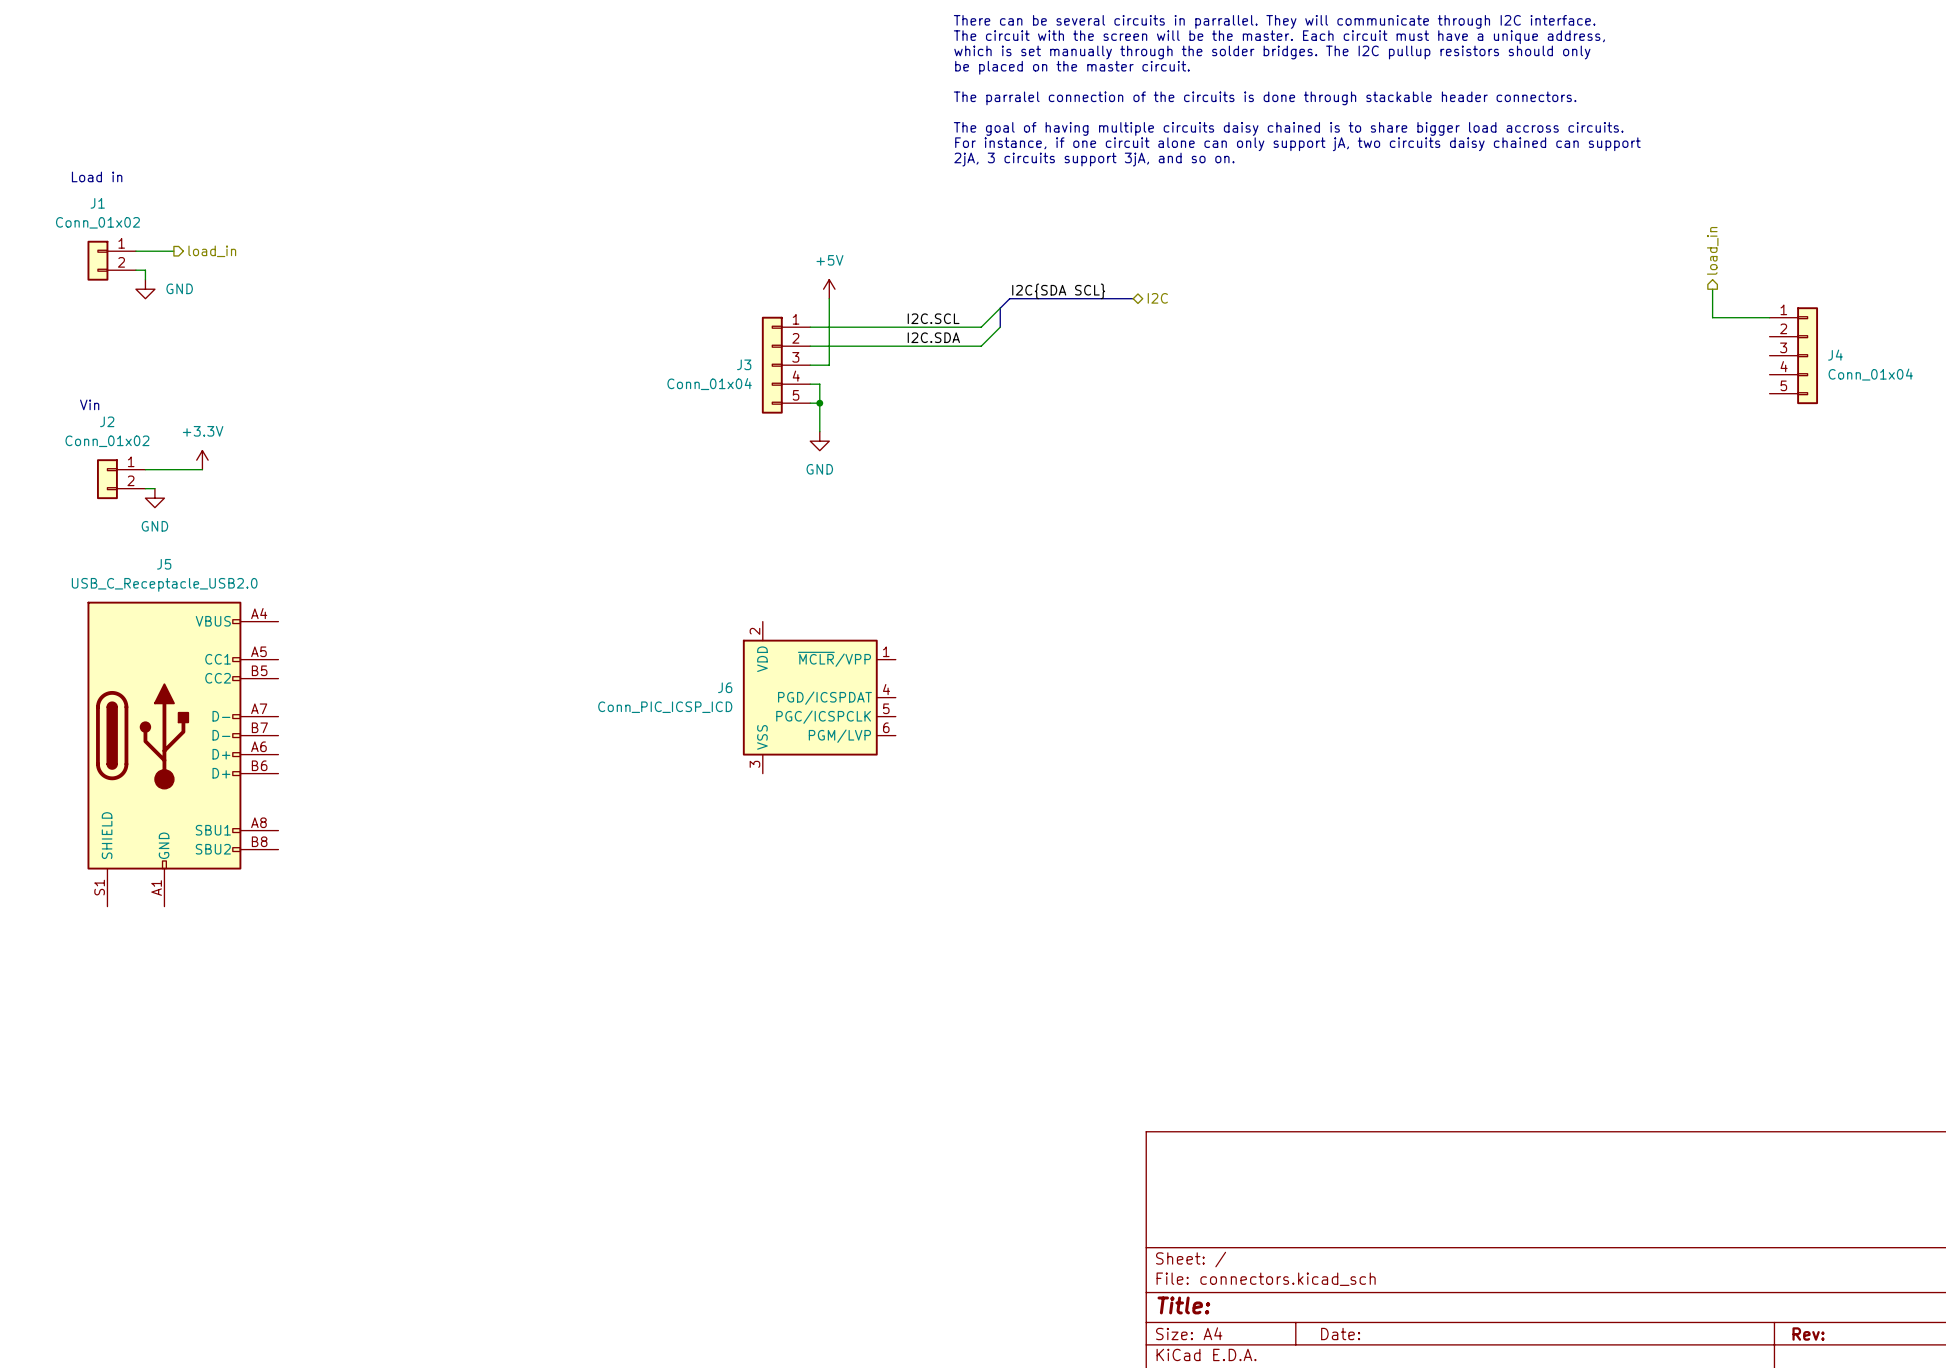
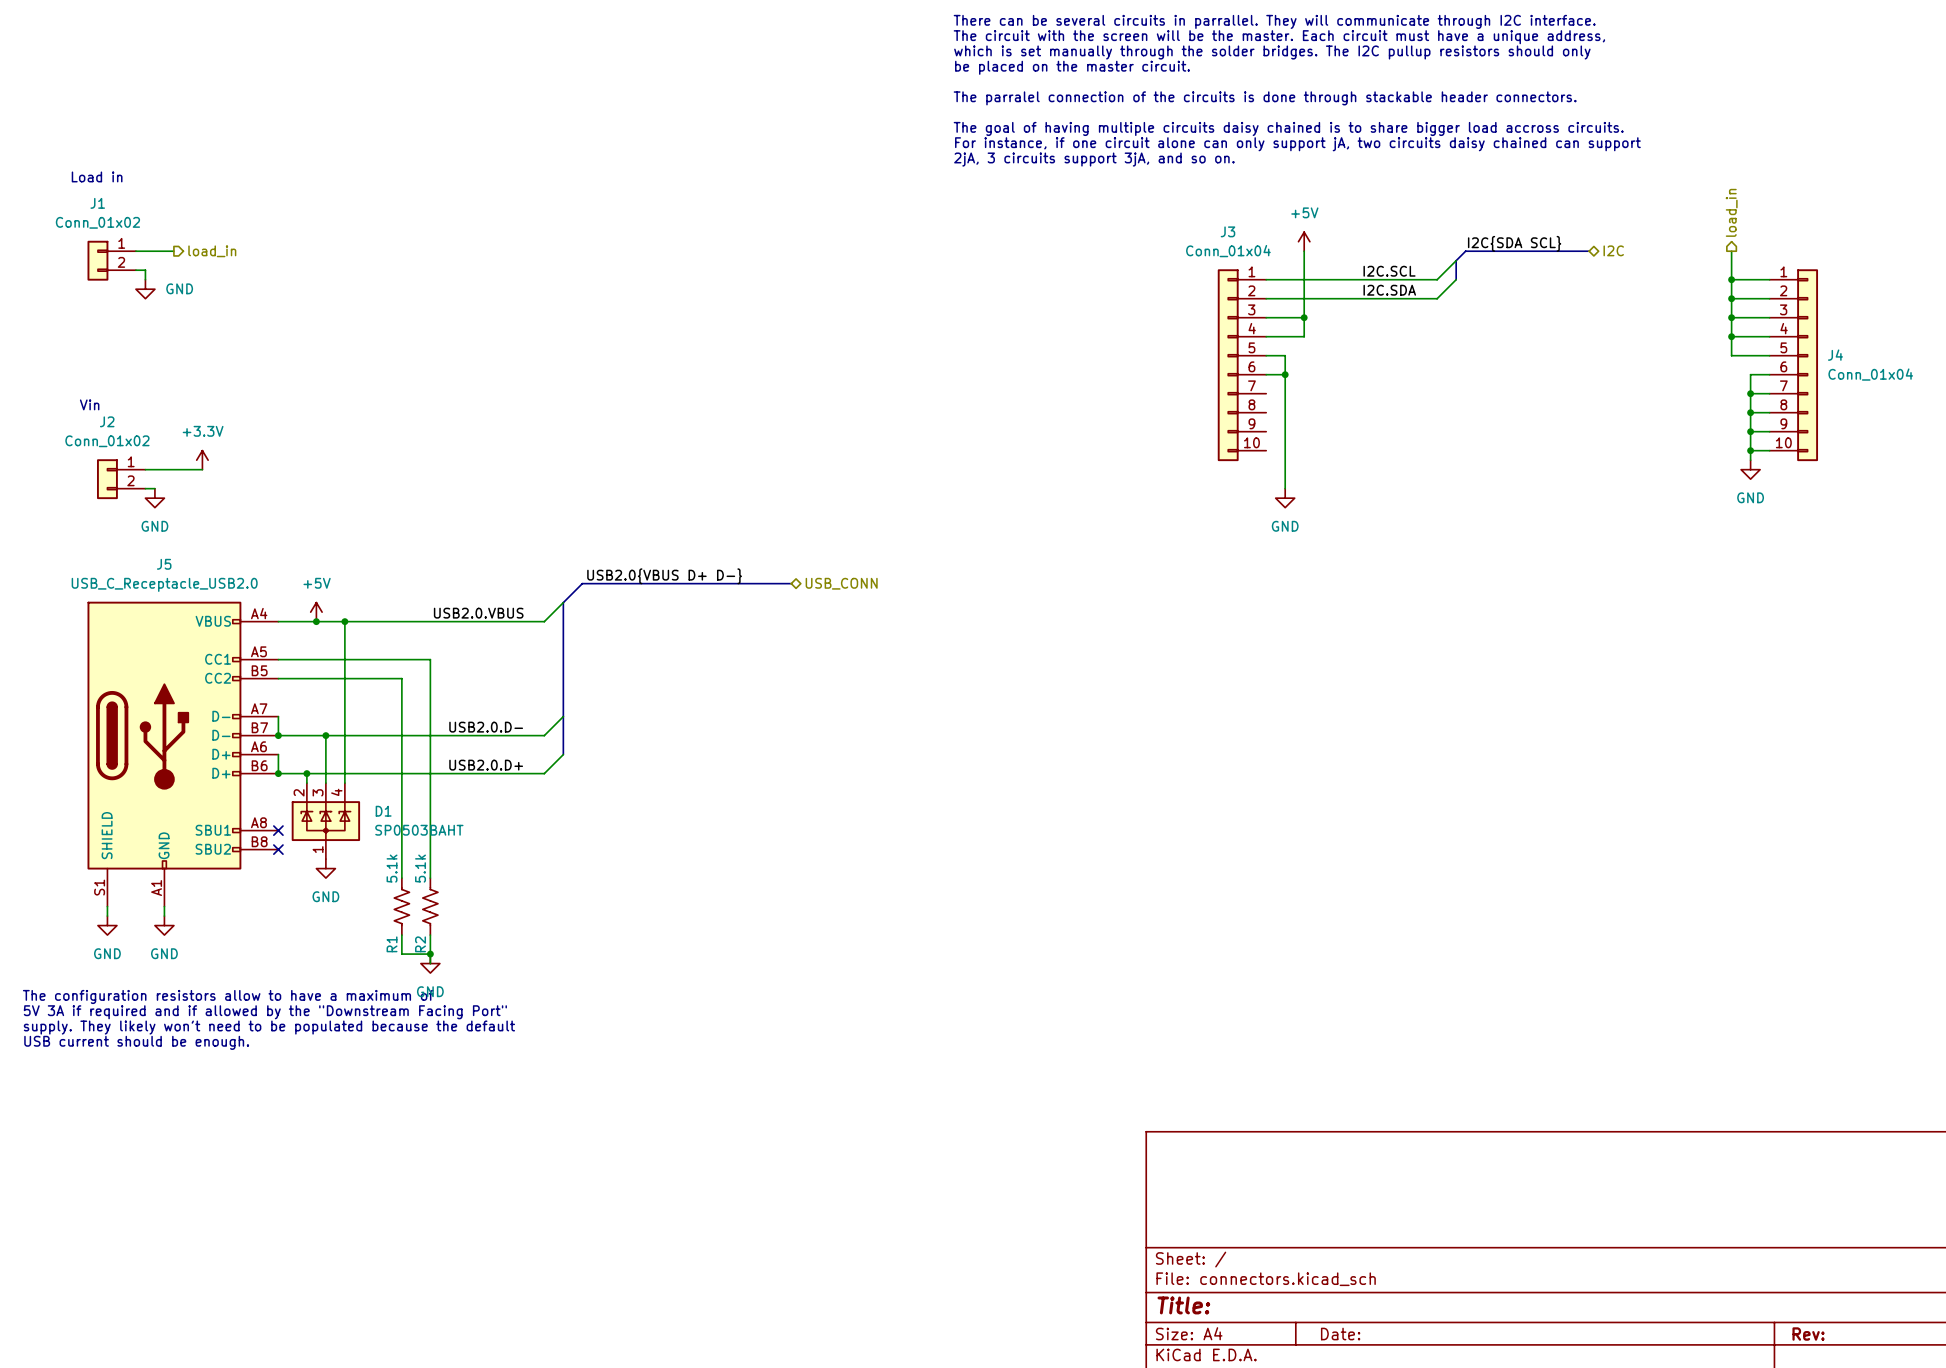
power symbol: none -> +5V (1304, 241)
label: none -> I2C{SDA SCL} (1514, 243)
hierarchical label: none -> I2C (1613, 250)
hierarchical label position: load_in (1712, 250) -> load_in (1731, 212)
wire: none -> (1304, 251) (1304, 336) (1266, 336)
bus: none -> (1589, 251) (1465, 251) (1456, 260) (1456, 279)
wire: none -> (1731, 251) (1731, 355) (1769, 355)
wire: none -> (1456, 260) (1437, 279) (1266, 279)
label: none -> I2C.SCL (1389, 271)
wire: none -> (1456, 279) (1437, 298) (1266, 298)
wire: none -> (1731, 279) (1769, 279)
junction: none -> (1731, 279)
power symbol: +5V (829, 289) -> none
wire: (1712, 289) (1712, 317) (1731, 317) -> none
label: none -> I2C.SDA (1389, 290)
label: I2C{SDA SCL} (1058, 291) -> none
wire: (829, 298) (829, 365) (810, 365) -> none
bus: (1133, 298) (1009, 298) (1000, 308) (1000, 327) -> none
hierarchical label: I2C (1157, 298) -> none
wire: none -> (1731, 298) (1769, 298)
junction: none -> (1731, 298)
J4 symbol: [1769, 307, 1819, 405] -> [1769, 269, 1819, 462]
wire: (1000, 308) (981, 327) (810, 327) -> none
J3 symbol: [761, 316, 811, 414] -> [1217, 269, 1267, 462]
wire: none -> (1266, 317) (1304, 317)
junction: none -> (1304, 317)
junction: none -> (1731, 317)
label: I2C.SCL (933, 318) -> none
wire: (1000, 327) (981, 346) (810, 346) -> none
wire: none -> (1731, 336) (1769, 336)
junction: none -> (1731, 336)
label: I2C.SDA (933, 337) -> none
wire: none -> (1266, 355) (1285, 355) (1285, 488)
J3 name position: J3 (744, 364) -> J3 (1227, 231)
wire: none -> (1266, 374) (1285, 374)
junction: none -> (1285, 374)
wire: none -> (1769, 374) (1750, 374) (1750, 460)
J3 value position: Conn_01x04 (709, 384) -> Conn_01x04 (1228, 251)
wire: (810, 384) (819, 384) (819, 431) -> none
wire: none -> (1750, 393) (1769, 393)
junction: none -> (1750, 393)
wire: (810, 403) (819, 403) -> none
junction: (819, 403) -> none
wire: none -> (1750, 412) (1769, 412)
junction: none -> (1750, 412)
wire: none -> (1750, 431) (1769, 431)
junction: none -> (1750, 431)
power symbol: GND (819, 441) -> none
wire: none -> (1750, 450) (1769, 450)
junction: none -> (1750, 450)
power symbol: none -> GND (1750, 469)
power symbol: none -> GND (1285, 498)
label: none -> USB2.0{VBUS D+ D-} (664, 576)
bus: none -> (791, 583) (582, 583) (563, 602) (563, 754)
hierarchical label: none -> USB_CONN (841, 583)
wire: none -> (563, 602) (544, 621) (278, 621)
power symbol: none -> +5V (316, 612)
label: none -> USB2.0.VBUS (478, 613)
junction: none -> (316, 621)
wire: none -> (344, 621) (344, 783)
junction: none -> (344, 621)
wire: none -> (278, 659) (430, 659) (430, 878)
wire: none -> (278, 678) (401, 678) (401, 878)
J6: Conn_PIC_ICSP_ICD (819, 697) -> none
wire: none -> (278, 716) (278, 735) (544, 735) (563, 716)
label: none -> USB2.0.D- (486, 727)
junction: none -> (278, 735)
wire: none -> (325, 735) (325, 783)
junction: none -> (325, 735)
wire: none -> (278, 754) (278, 773) (544, 773) (563, 754)
label: none -> USB2.0.D+ (486, 765)
junction: none -> (278, 773)
wire: none -> (306, 773) (306, 783)
junction: none -> (306, 773)
D1: none -> SP0503BAHT (325, 821)
no-connect mark: none -> (278, 830)
no-connect mark: none -> (278, 849)
power symbol: none -> GND (325, 868)
wire: none -> (107, 906) (107, 916)
wire: none -> (164, 906) (164, 916)
R1: none -> 5.1k (401, 906)
R2: none -> 5.1k (430, 906)
power symbol: none -> GND (107, 925)
power symbol: none -> GND (164, 925)
wire: none -> (401, 935) (401, 954) (430, 954)
wire: none -> (430, 935) (430, 963)
junction: none -> (430, 954)
power symbol: none -> GND (430, 963)
text: none -> The configuration resistors allow to have a maximum of (228, 996)
text: none -> 5V 3A if required and if allowed by the "Downstream Facing Port" (265, 1012)
text: none -> supply. They likely won't need to be populated because the default (269, 1027)
text: none -> USB current should be enough. (136, 1042)

